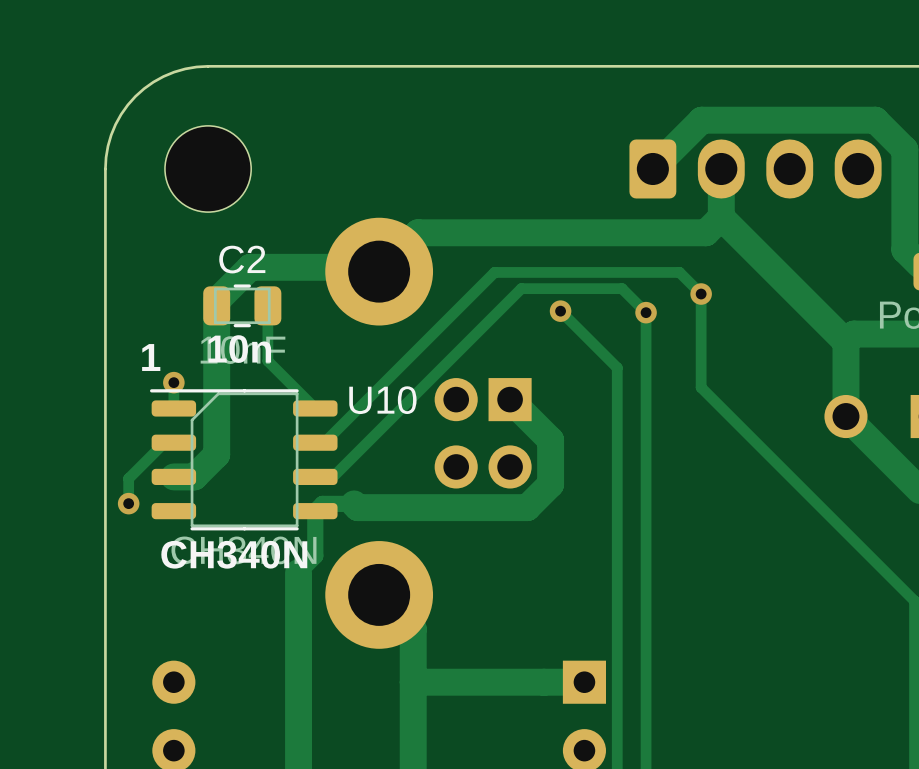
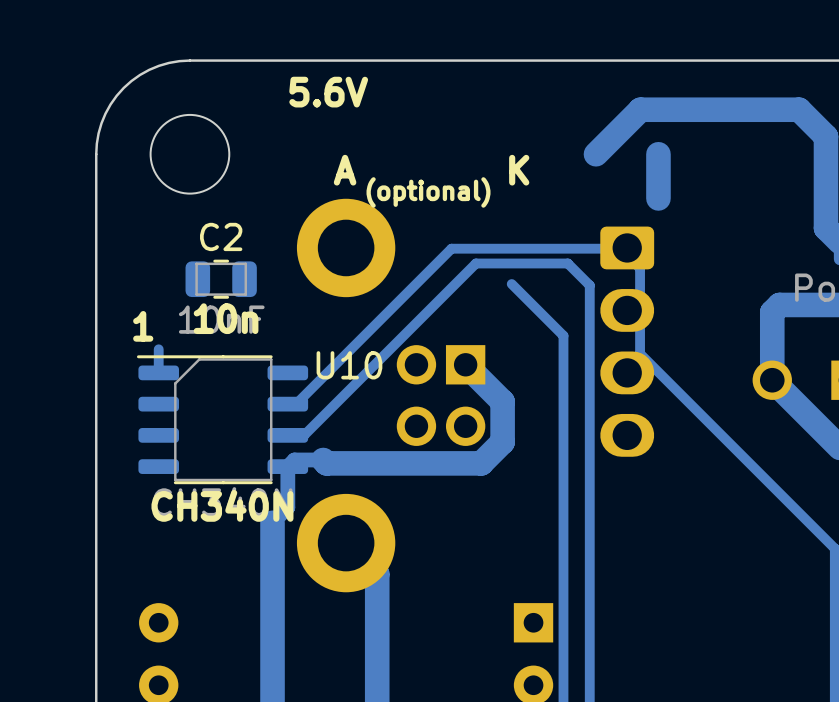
text: none -> 5.6V (328, 92)
part rotation: 0° (755, 168) -> 90° clockwise (627, 341)
part position: (755, 168) -> (627, 341)
text: none -> A (345, 170)
text: none -> K (519, 170)
text: none -> (optional) (428, 192)
via: (701, 294) -> none
track: (267, 305) (267, 361) (315, 408) -> none
via: (560, 311) -> none
via: (646, 312) -> none
track: (845, 342) (721, 217) (705, 232) (418, 232) (379, 271) (374, 267) (250, 267) (216, 300) (216, 454) (194, 476) (173, 476) -> none
via: (173, 382) -> none
track: (173, 442) (164, 442) (128, 478) (128, 503) -> none
via: (128, 503) -> none
track: (584, 682) (413, 682) -> none

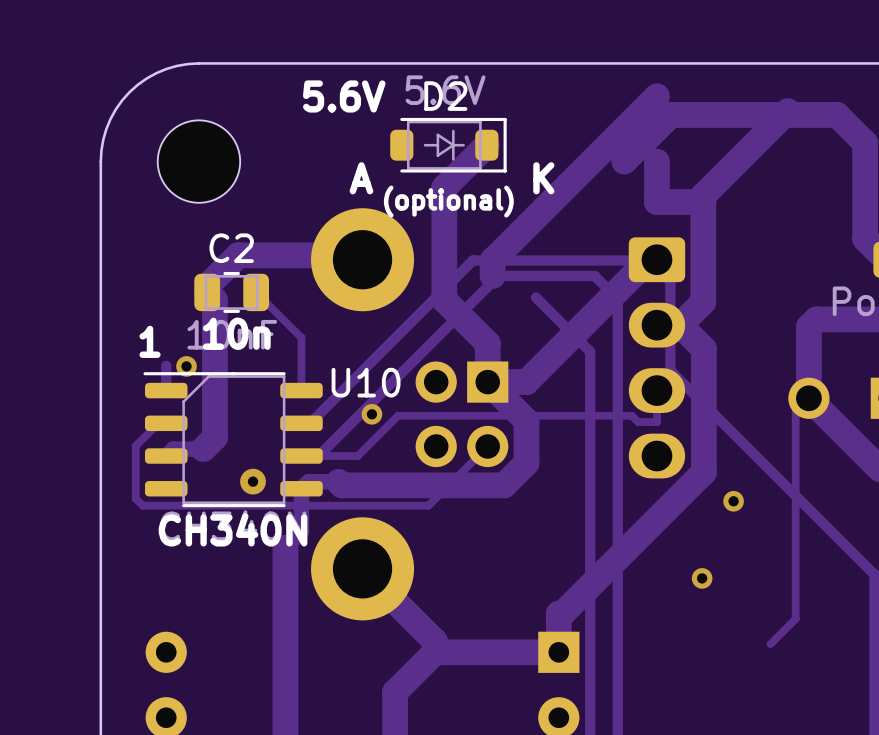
track: none -> (656, 96) (492, 260) (492, 276)
track: none -> (787, 111) (703, 195) (703, 301) (680, 325)
D2: none -> 5.6V (448, 145)
track: none -> (486, 145) (444, 187) (444, 300) (487, 343) (487, 382) (526, 382) (648, 259) (656, 259)
track: none -> (656, 161) (656, 202) (703, 202)
track: (658, 154) (658, 198) -> none
track: none -> (362, 255) (238, 255) (207, 286) (207, 292) (214, 300) (214, 437) (203, 449) (173, 449) (166, 456)
track: none -> (256, 292) (301, 337) (301, 390)
track: none -> (680, 325) (703, 348) (703, 472) (562, 613) (558, 613) (558, 652) (434, 652)
via: none -> (186, 366)
track: none -> (656, 390) (656, 422) (638, 422) (631, 415) (398, 415) (357, 456) (318, 456)
track: none -> (795, 406) (795, 618) (770, 644)
via: none -> (371, 414)
track: none -> (166, 423) (158, 423) (135, 446) (135, 498) (142, 505) (428, 505) (487, 446)
via: none -> (253, 481)
via: none -> (733, 501)
via: none -> (702, 578)
track: (377, 574) (377, 660) -> (395, 601) (434, 641) (434, 652)
track: none -> (434, 652) (395, 692)

